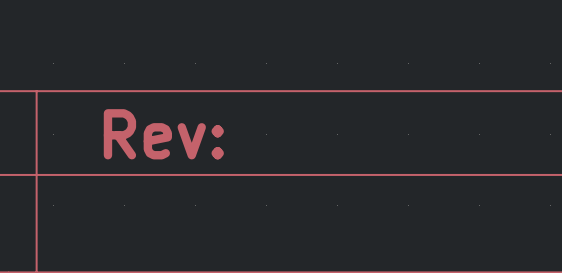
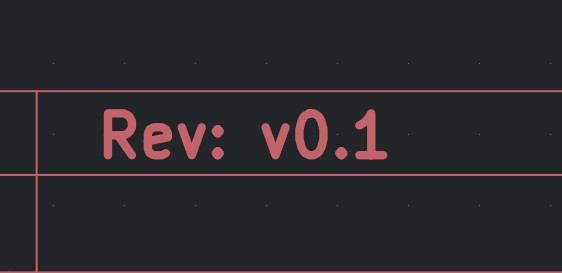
title block: Rev: (163, 134) -> Rev: v0.1 (245, 134)

